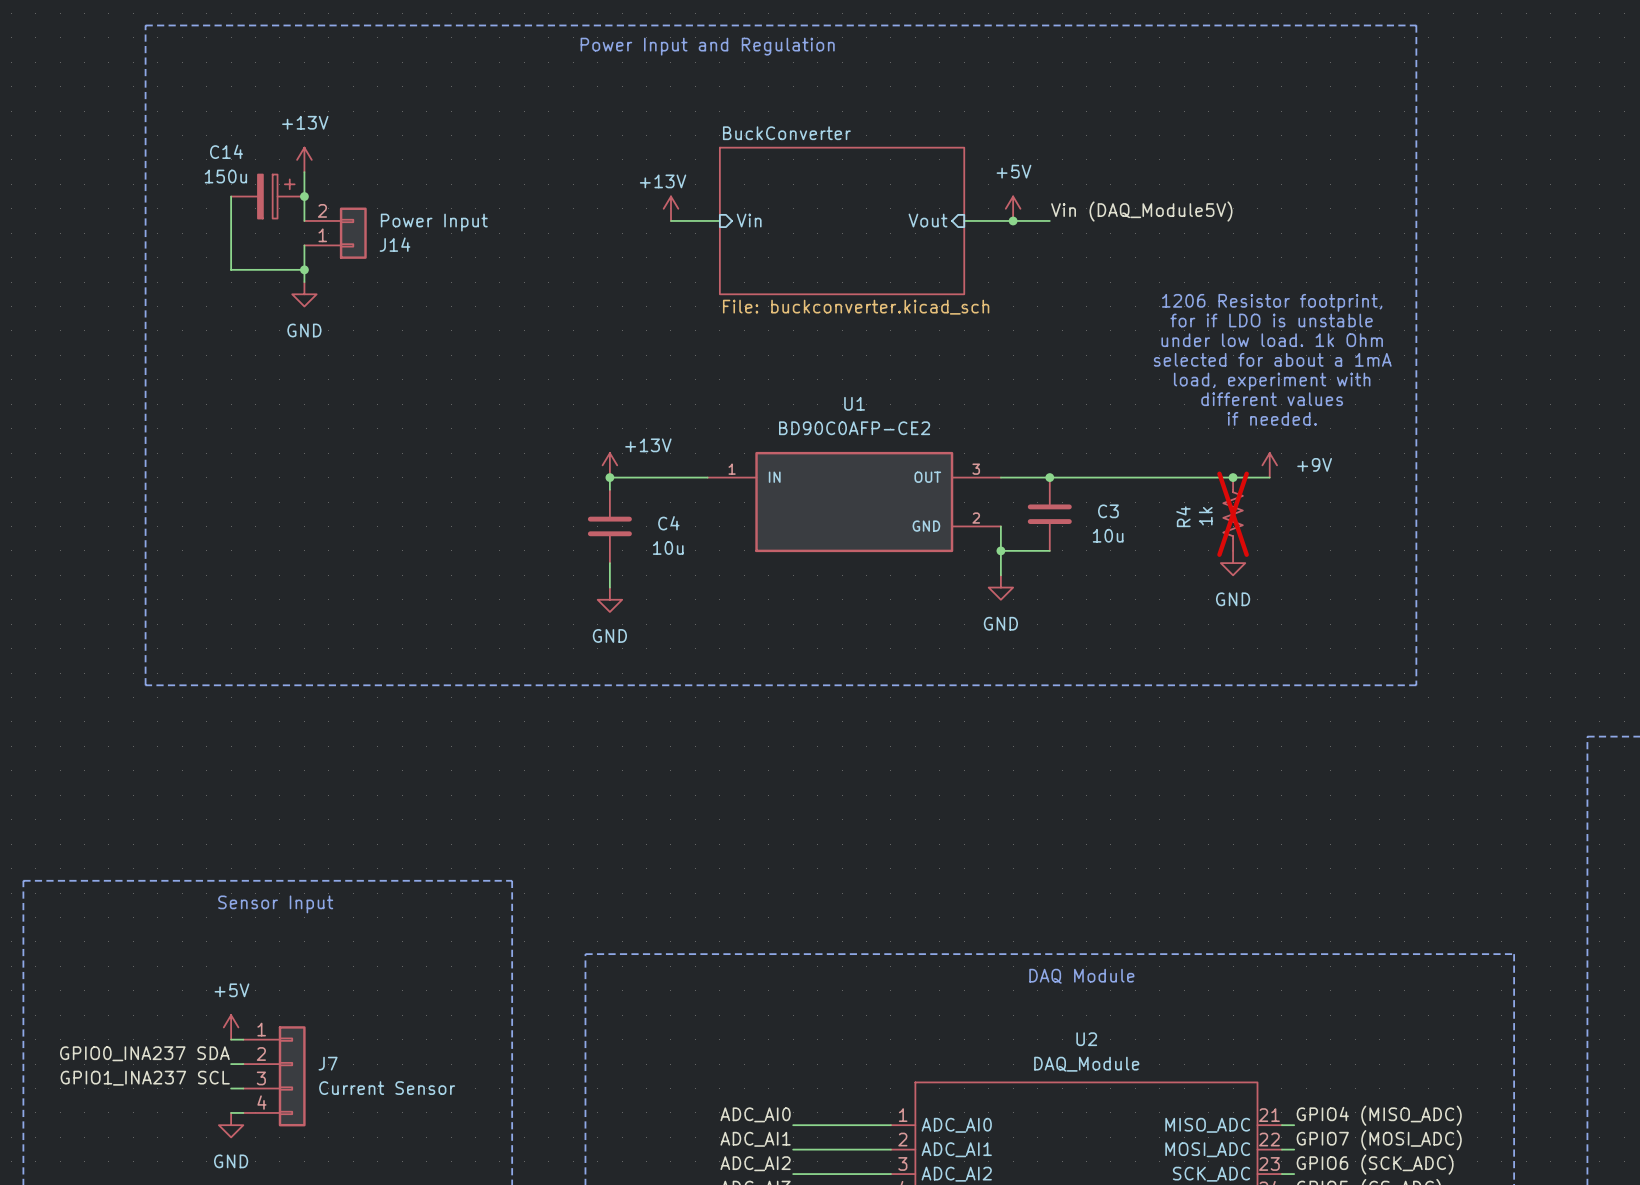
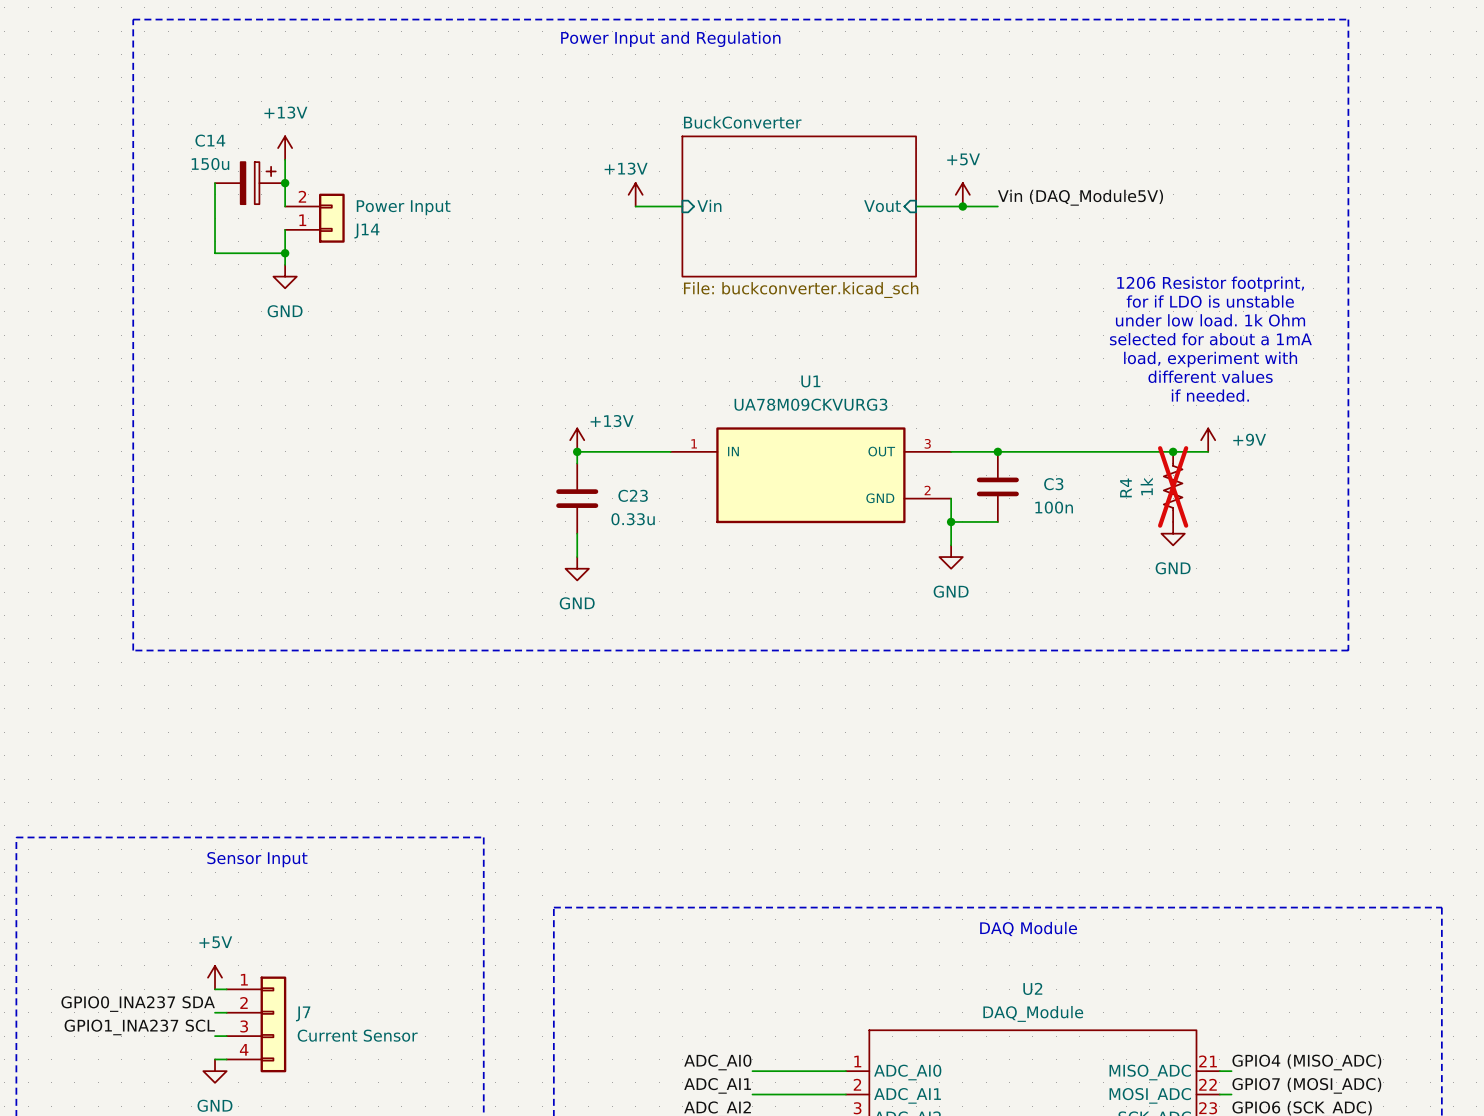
U1 value: BD90C0AFP-CE2 (854, 428) -> UA78M09CKVURG3 (810, 404)
C4 name: C4 (668, 523) -> C23 (633, 495)
C3 value: 10u (1108, 535) -> 100n (1054, 507)
C4 value: 10u (668, 547) -> 0.33u (633, 519)

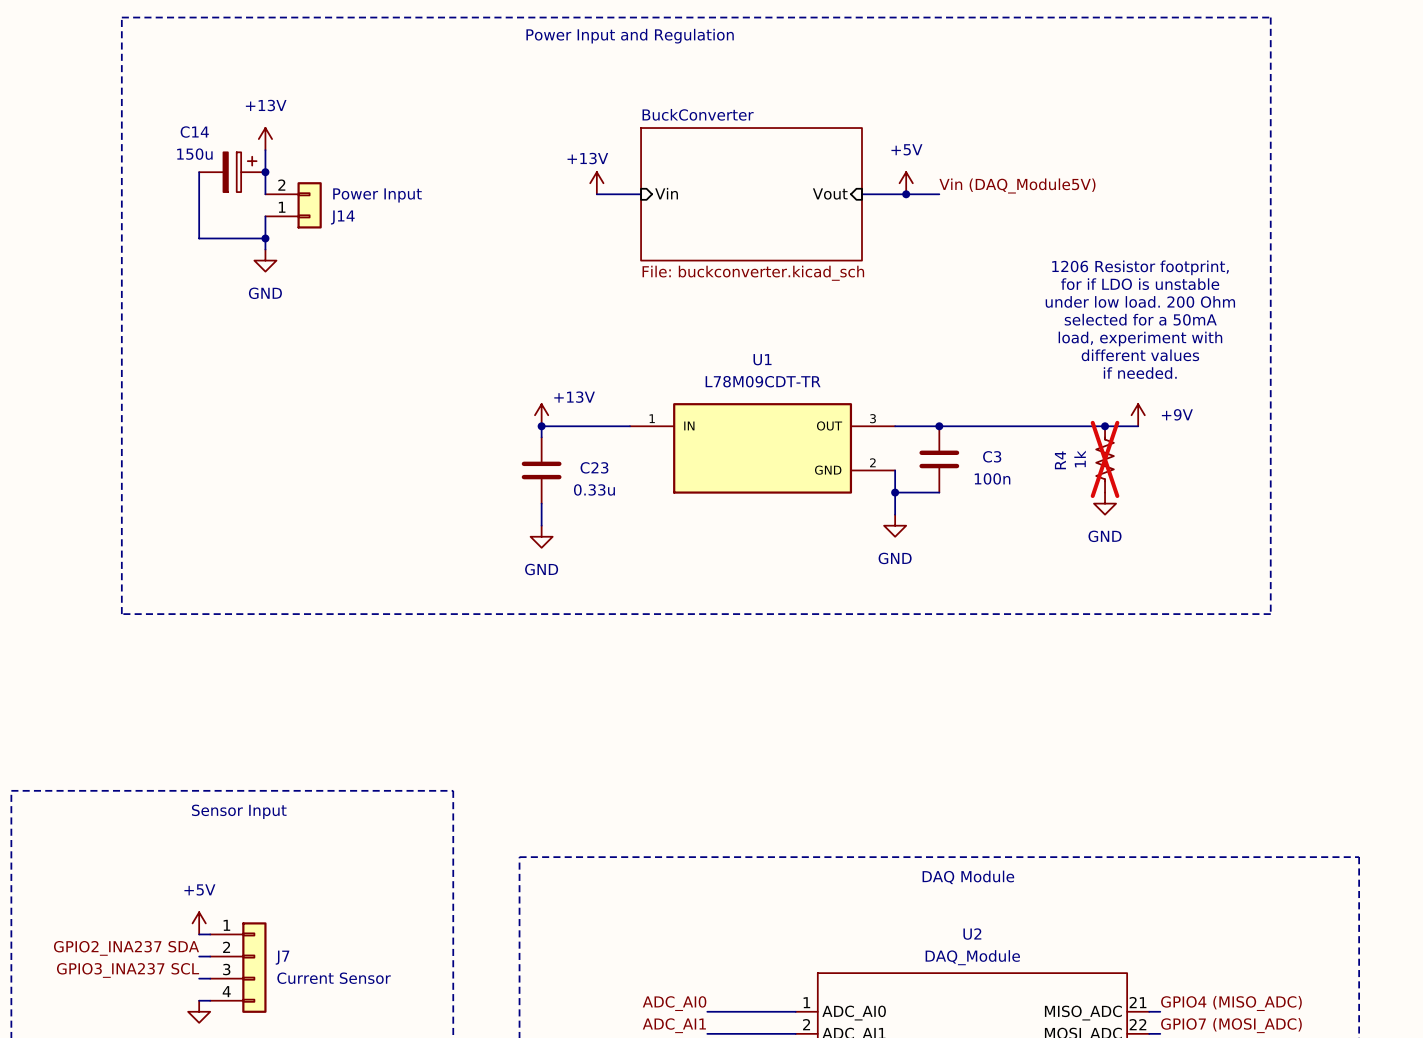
text: under low load. 1k Ohm (1210, 320) -> under low load. 200 Ohm (1140, 301)
text: selected for about a 1mA (1210, 339) -> selected for a 50mA (1140, 319)
U1 value: UA78M09CKVURG3 (810, 404) -> L78M09CDT-TR (763, 381)
label: GPIO0_INA237 SDA (138, 1004) -> GPIO2_INA237 SDA (126, 948)
label: GPIO1_INA237 SCL (139, 1027) -> GPIO3_INA237 SCL (128, 970)

